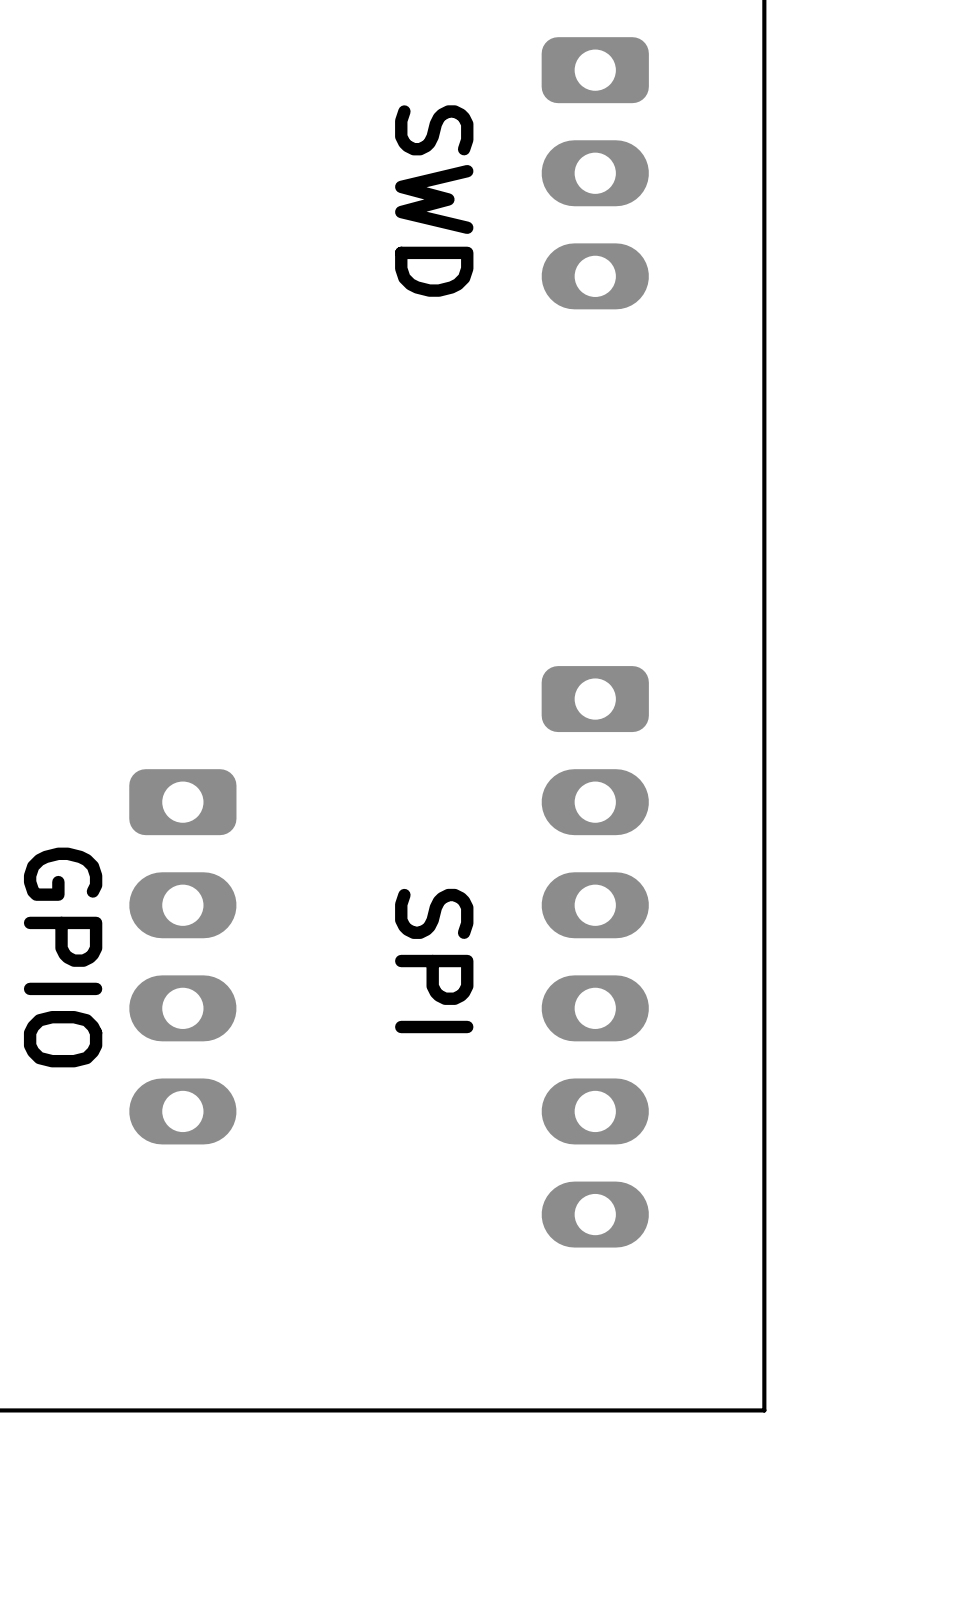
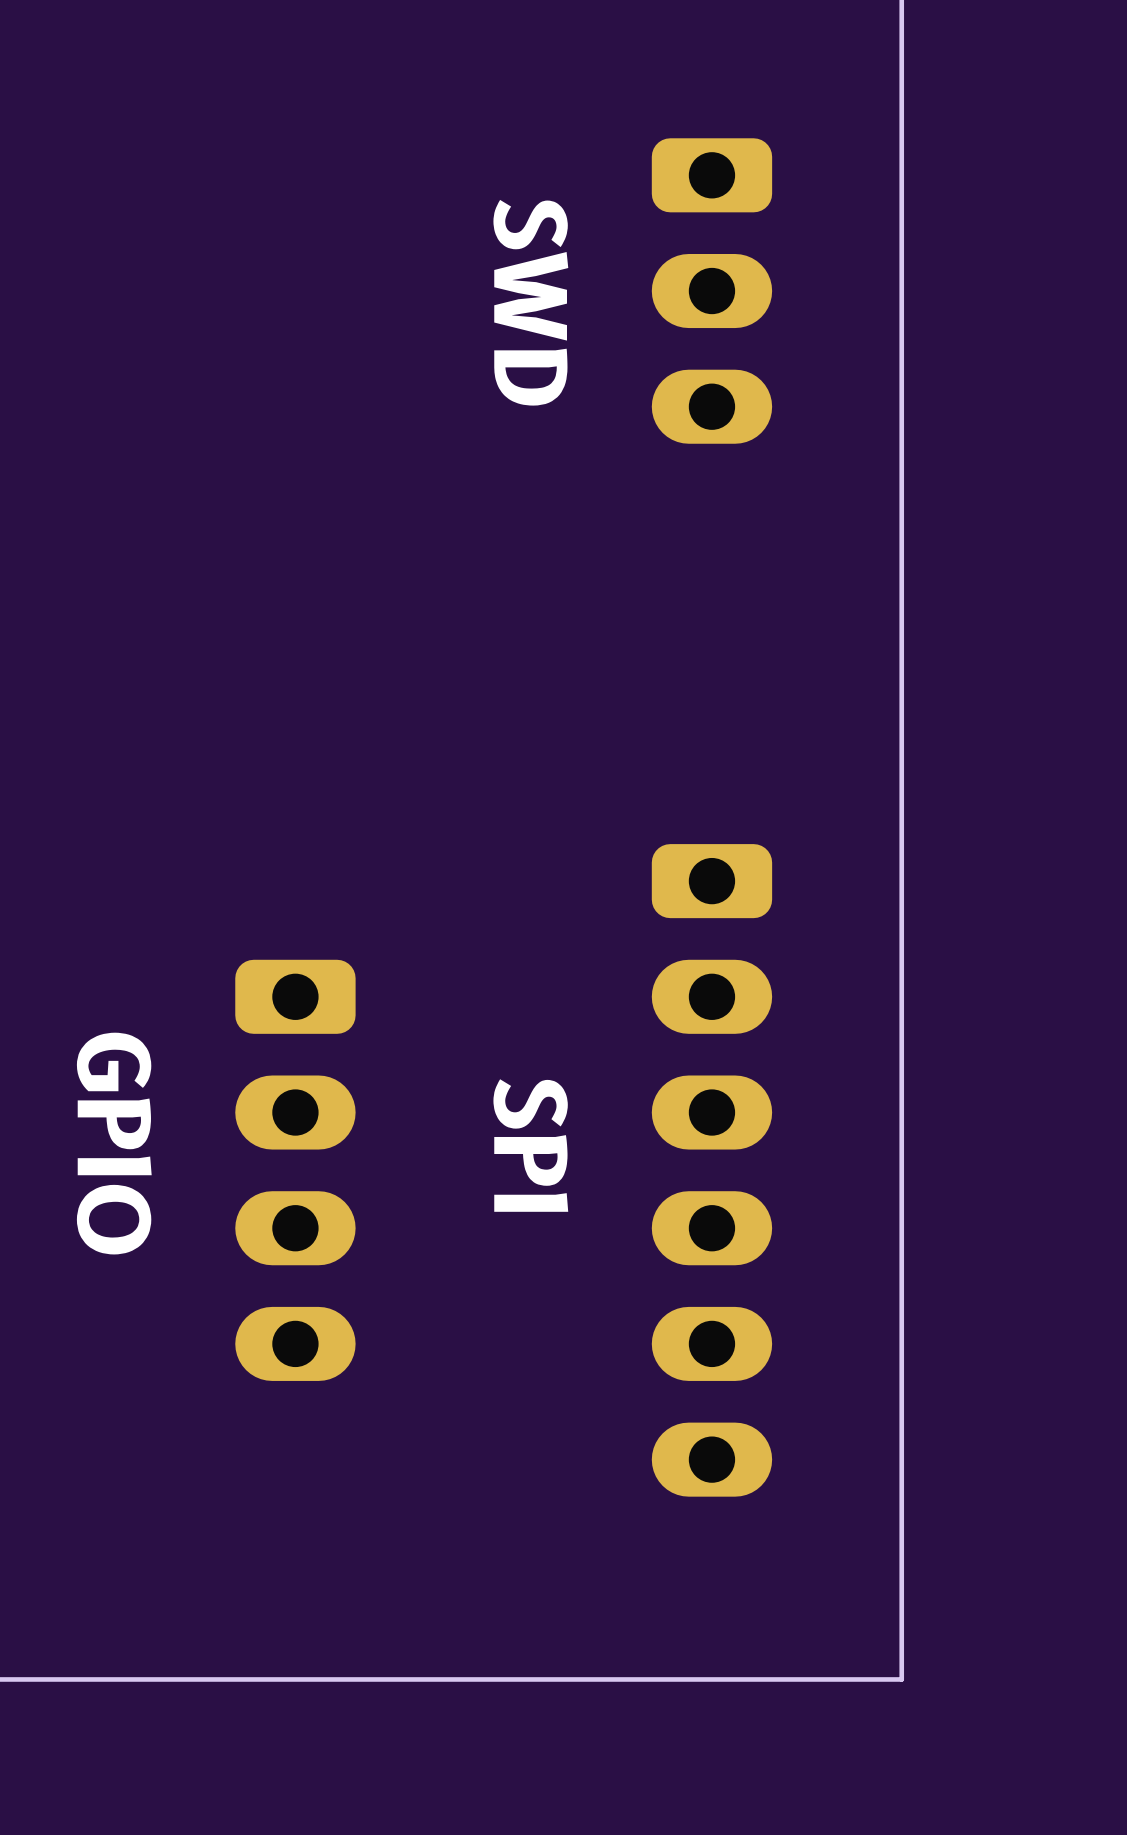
part position: (182, 956) -> (295, 1170)

